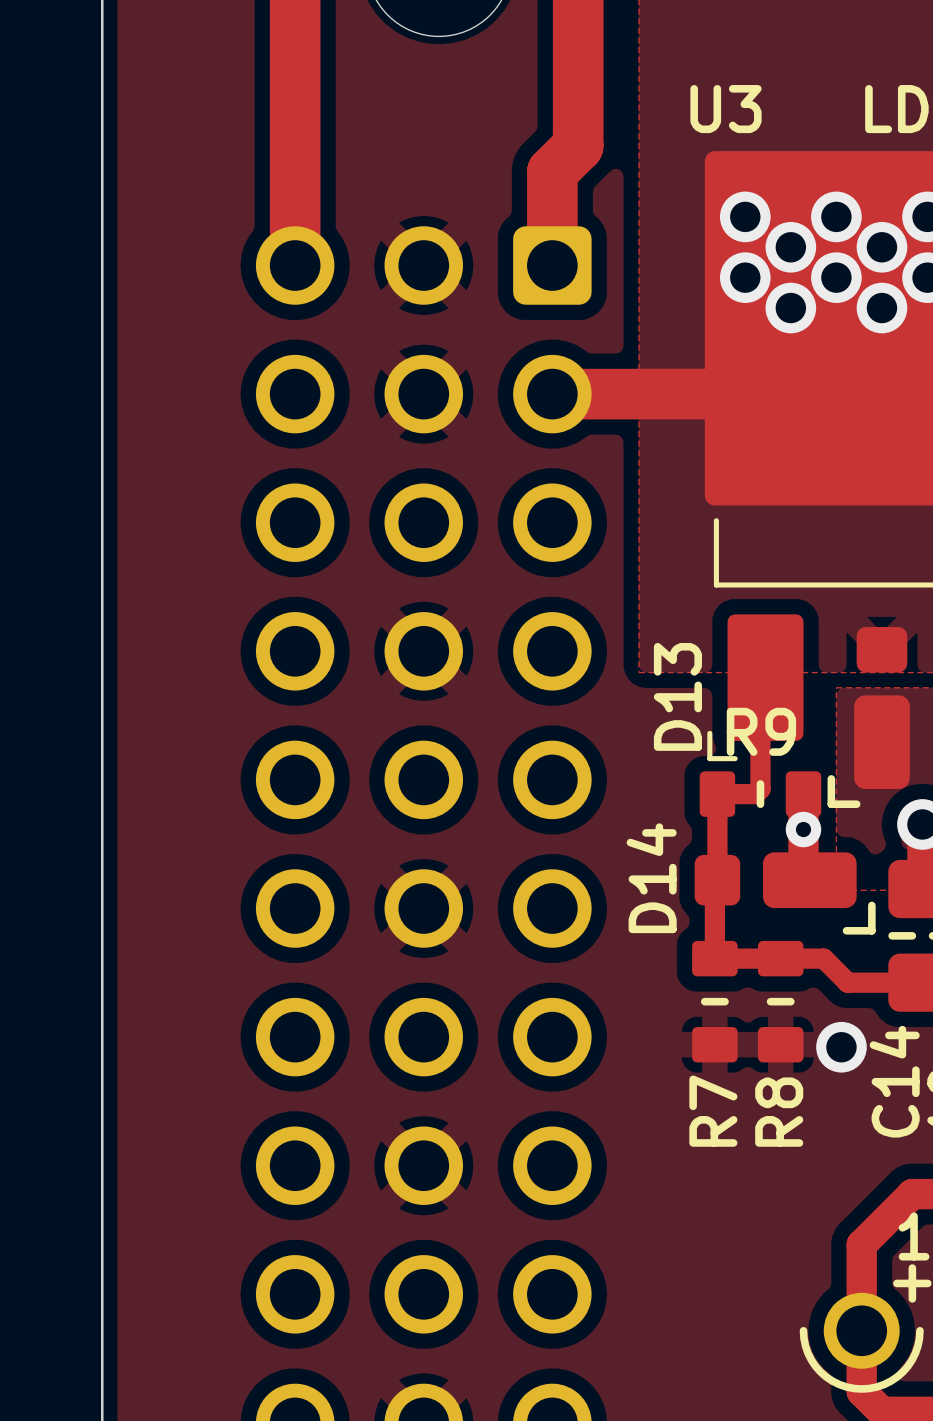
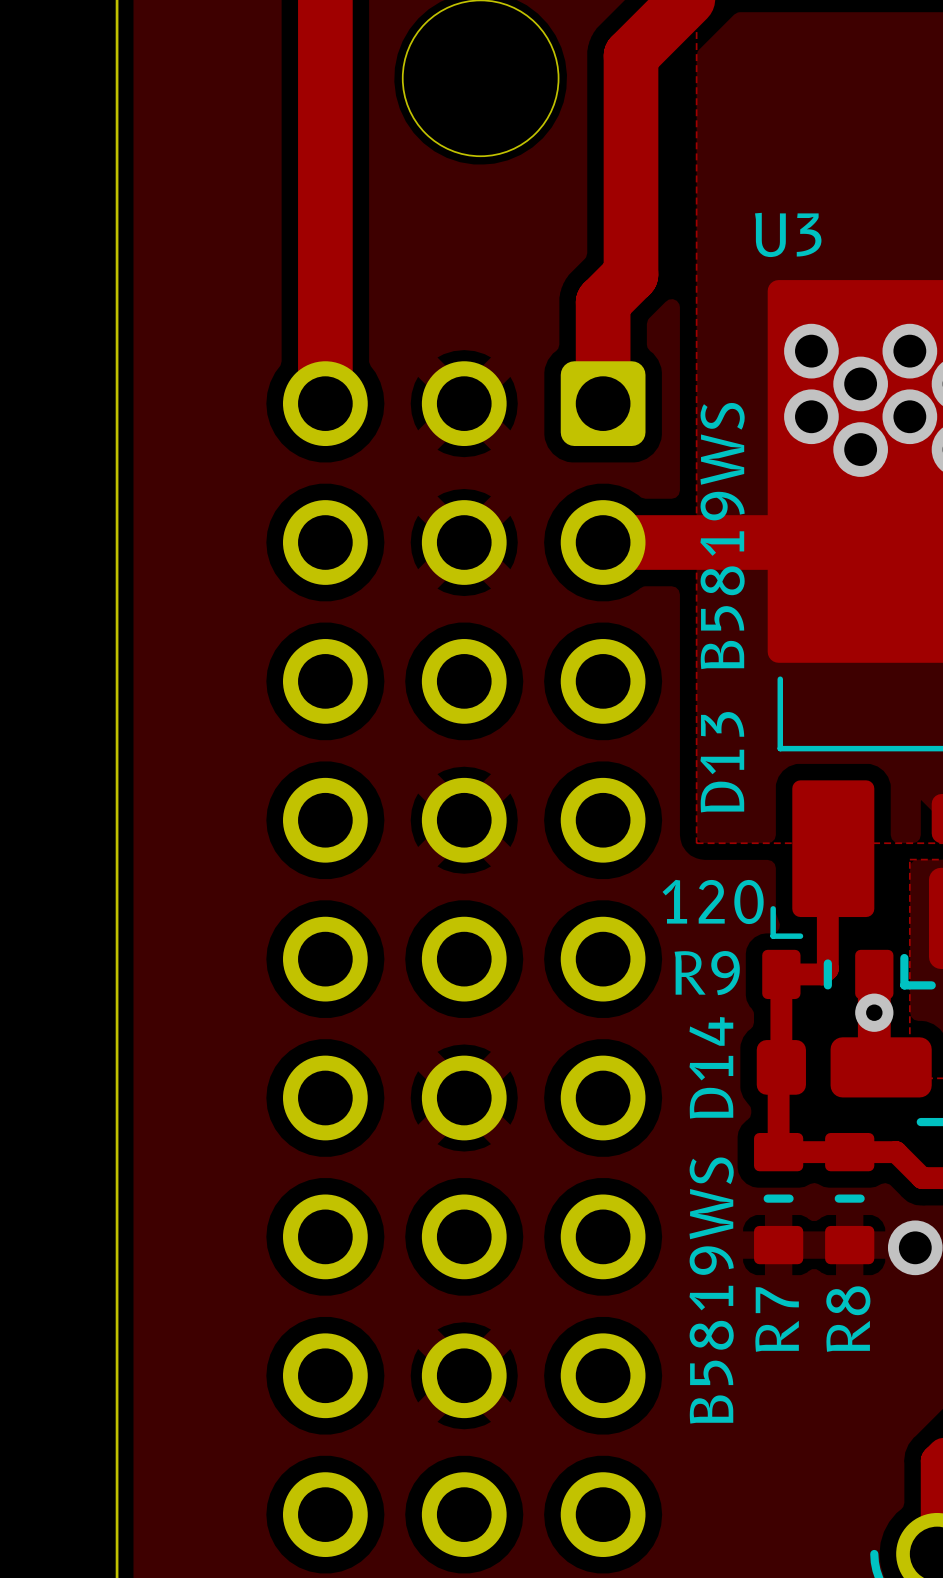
D13 value: none -> B5819WS (722, 536)
D13 name position: D13 (677, 696) -> D13 (722, 762)
R9 value: none -> 120 (713, 901)
R9 name position: R9 (761, 731) -> R9 (707, 973)
D14 value: none -> B5819WS (711, 1290)

